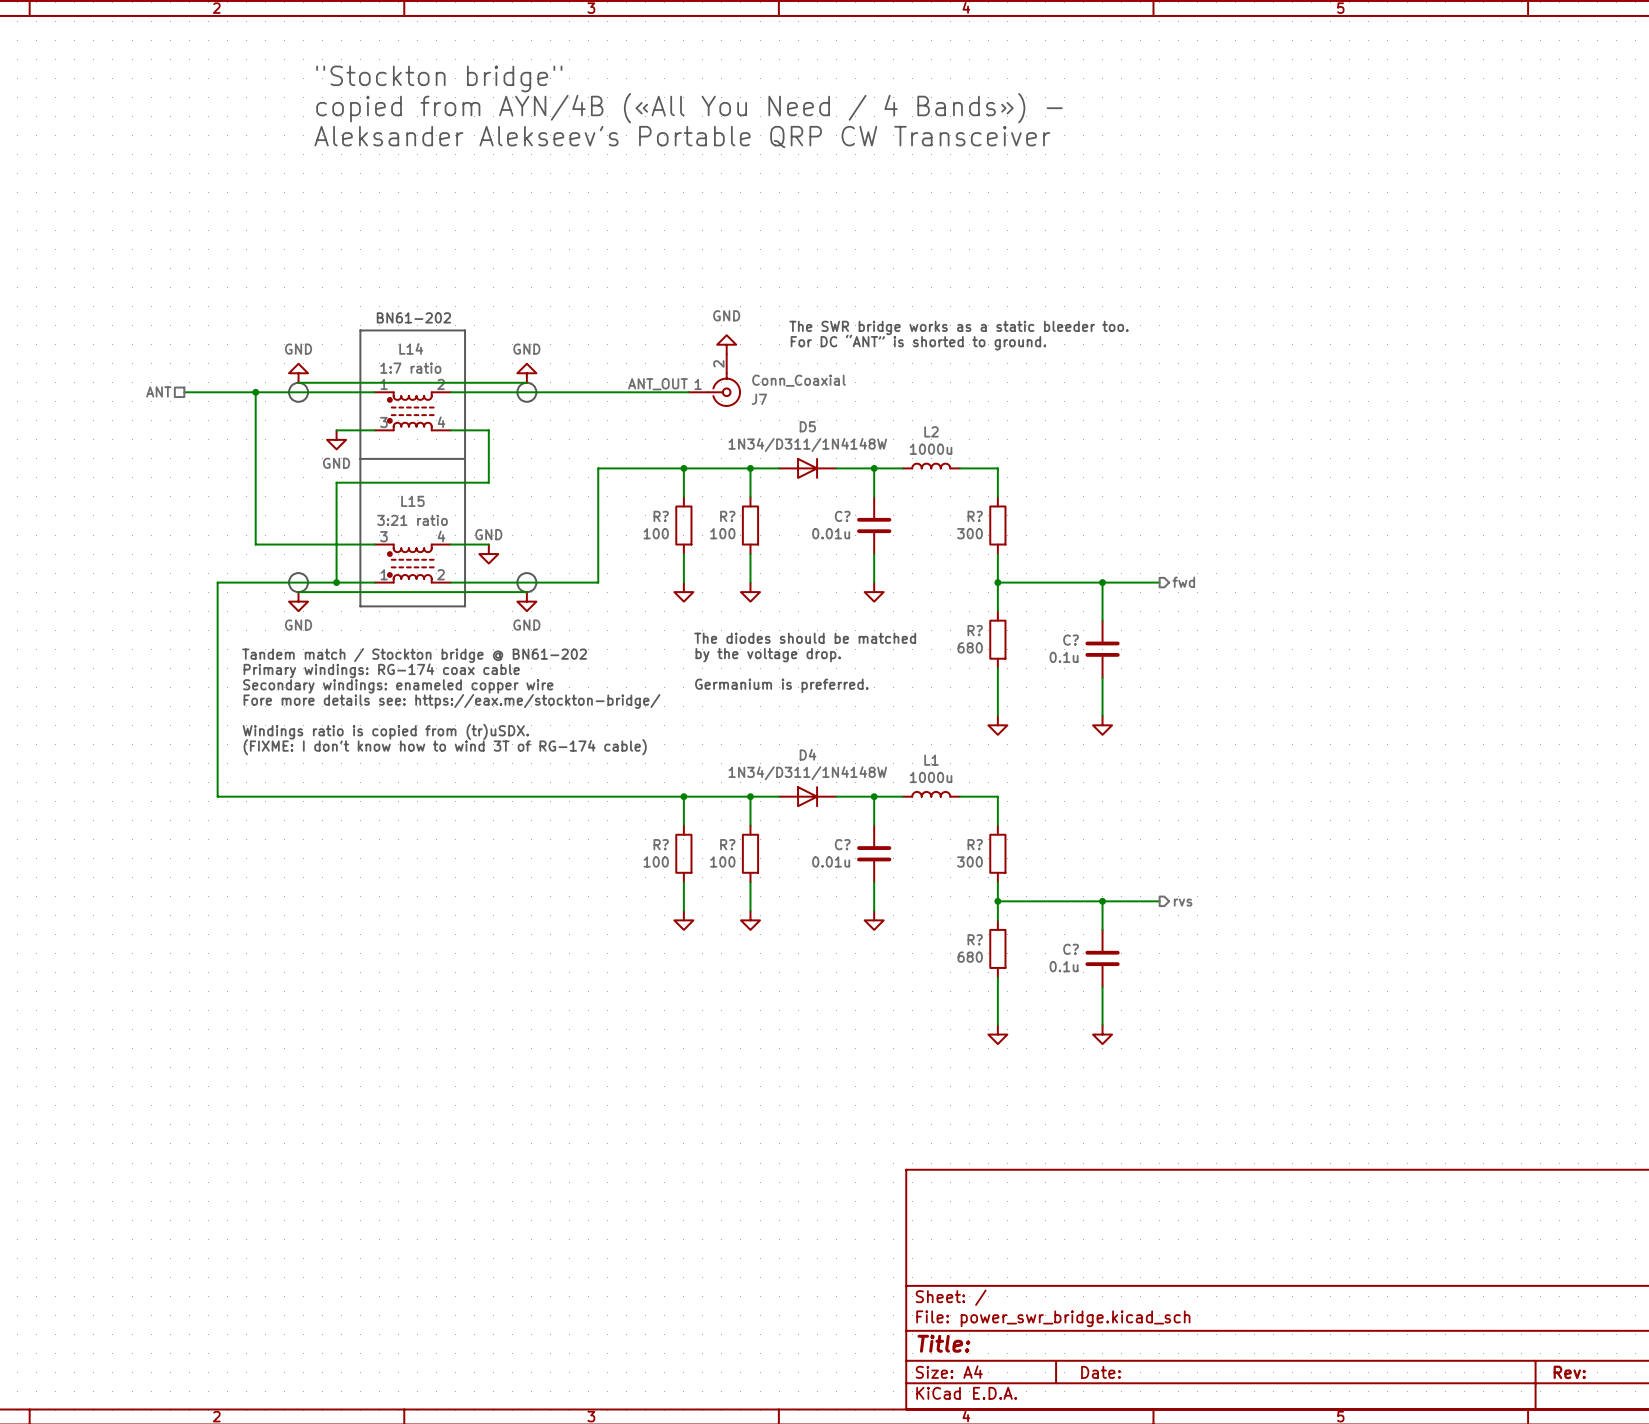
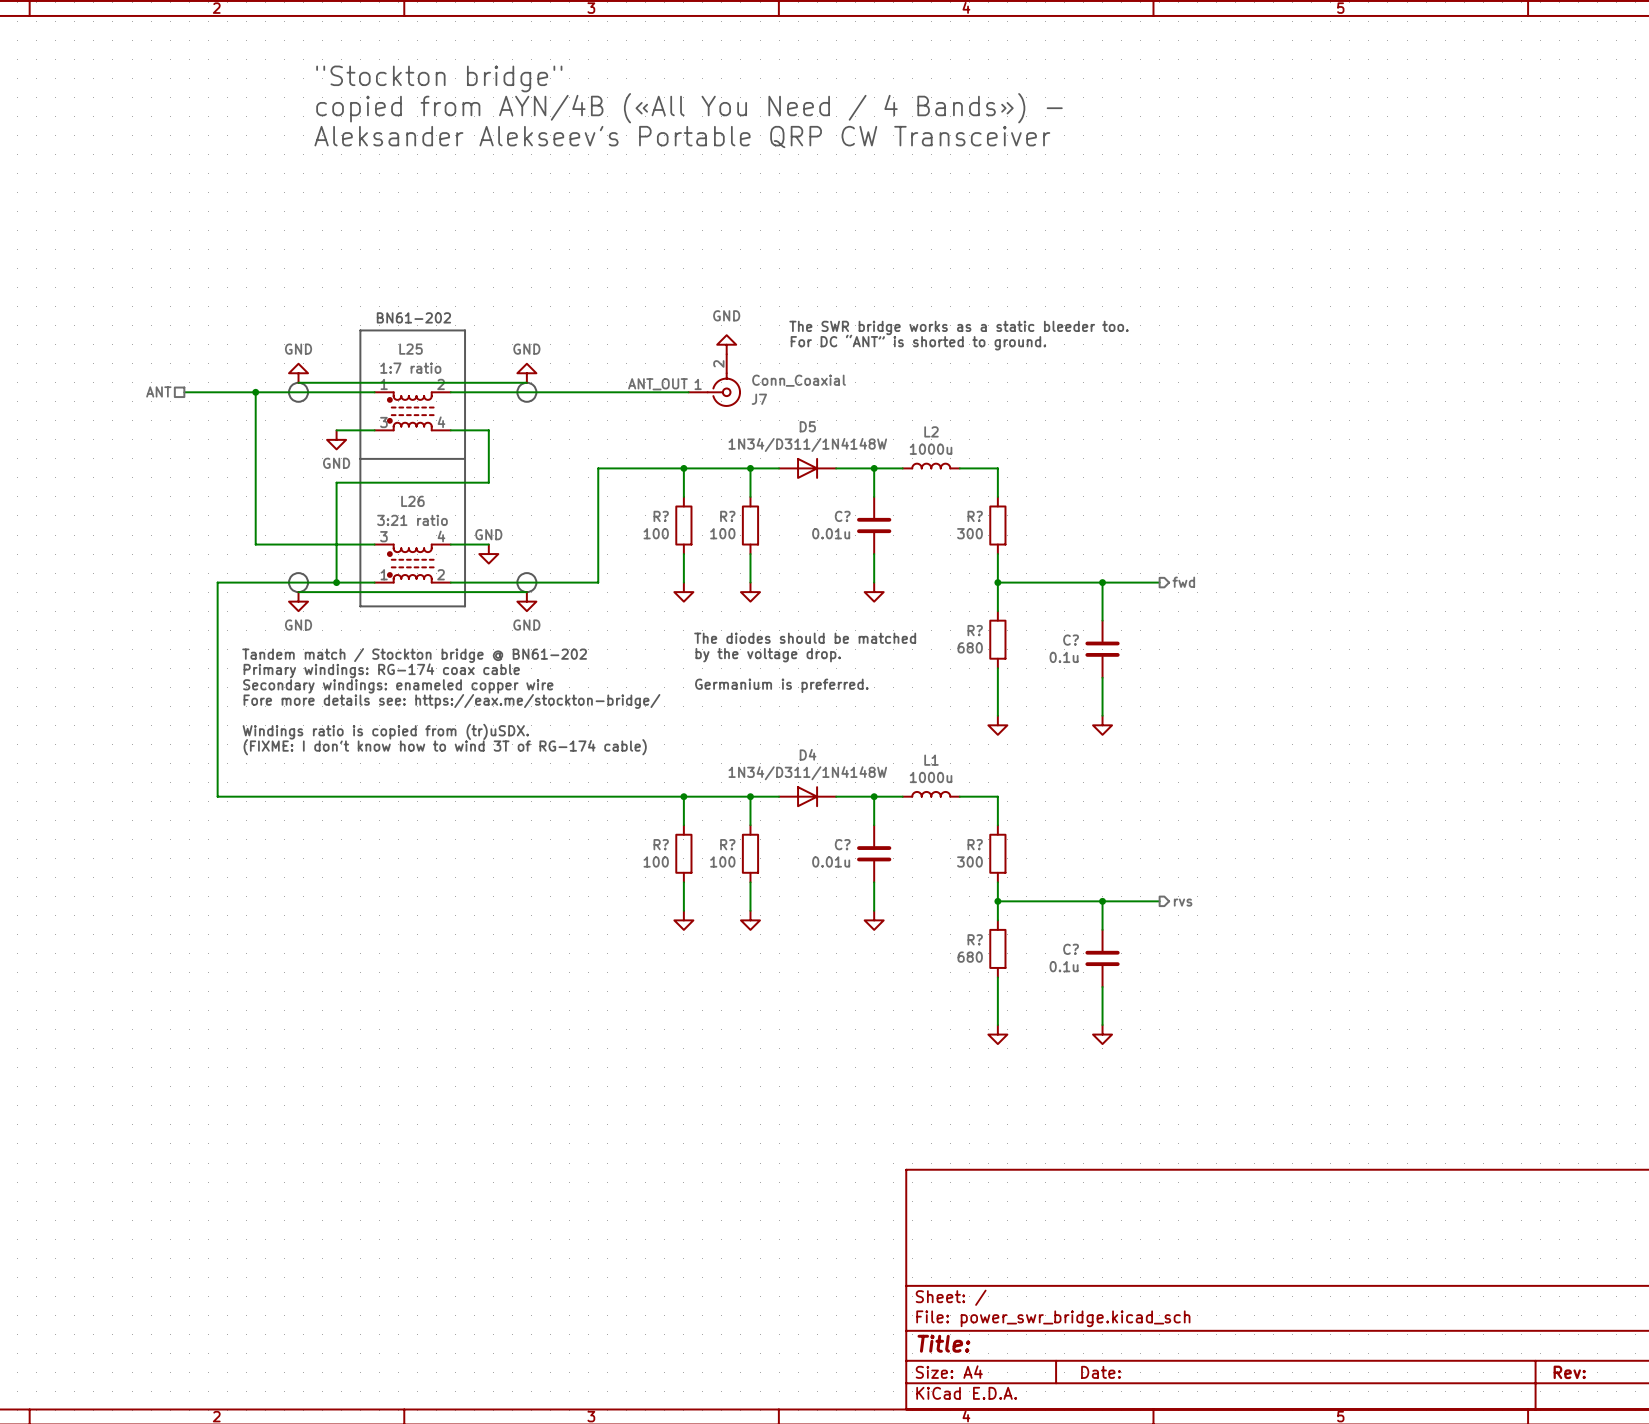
L14 name: L14 (411, 348) -> L25 (411, 349)
L15 name: L15 (412, 501) -> L26 (412, 501)

